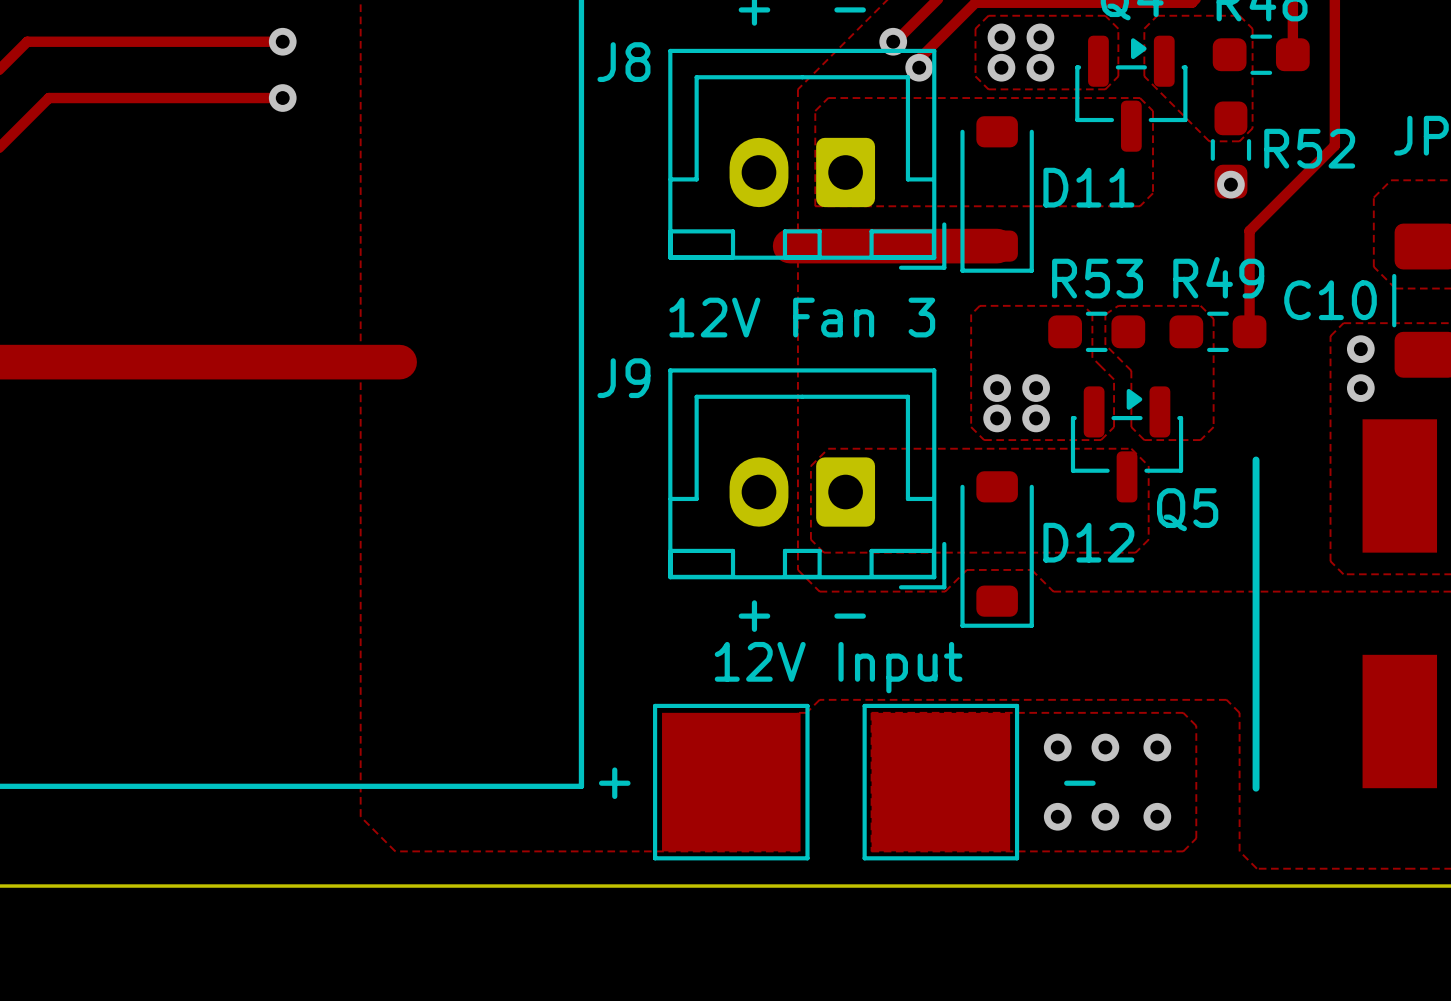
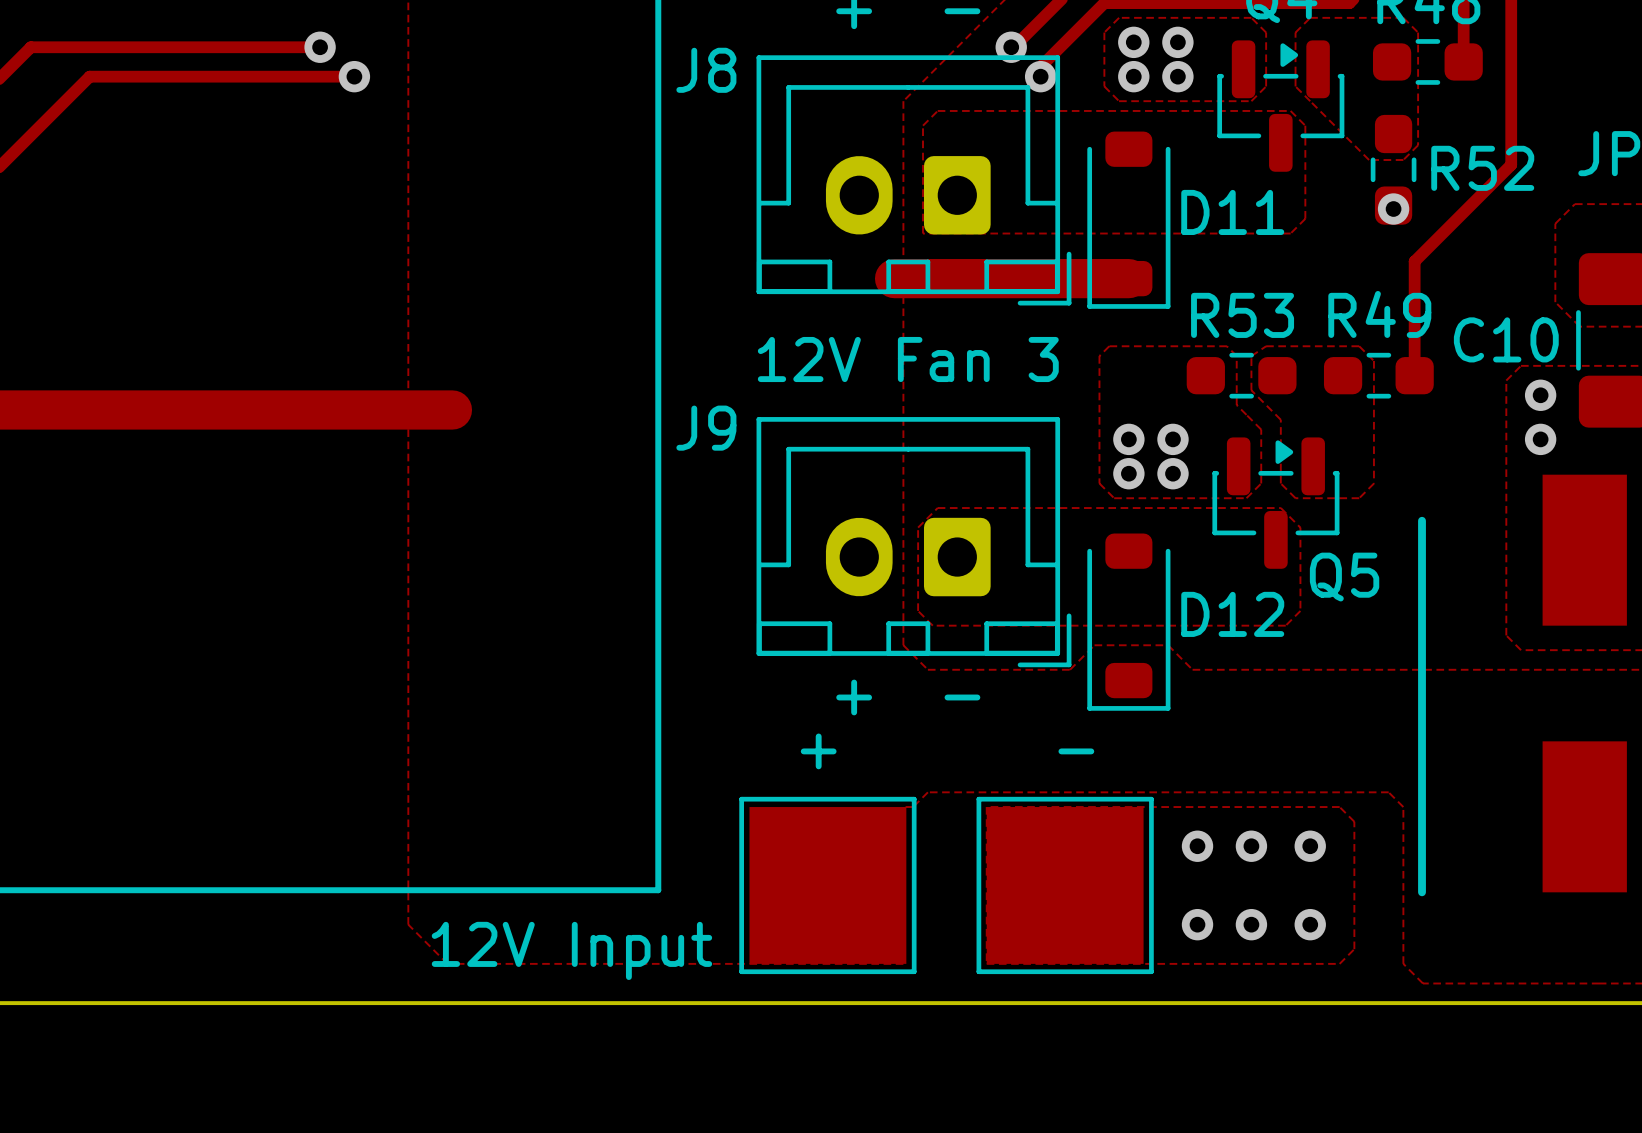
track: (48, 98) (282, 98) -> (55, 110) (89, 76) (354, 76)
via position: (282, 98) -> (354, 76)
text: 12V Input (838, 667) -> + - (947, 751)
text: + - (847, 783) -> none
text: none -> 12V Input (571, 950)

